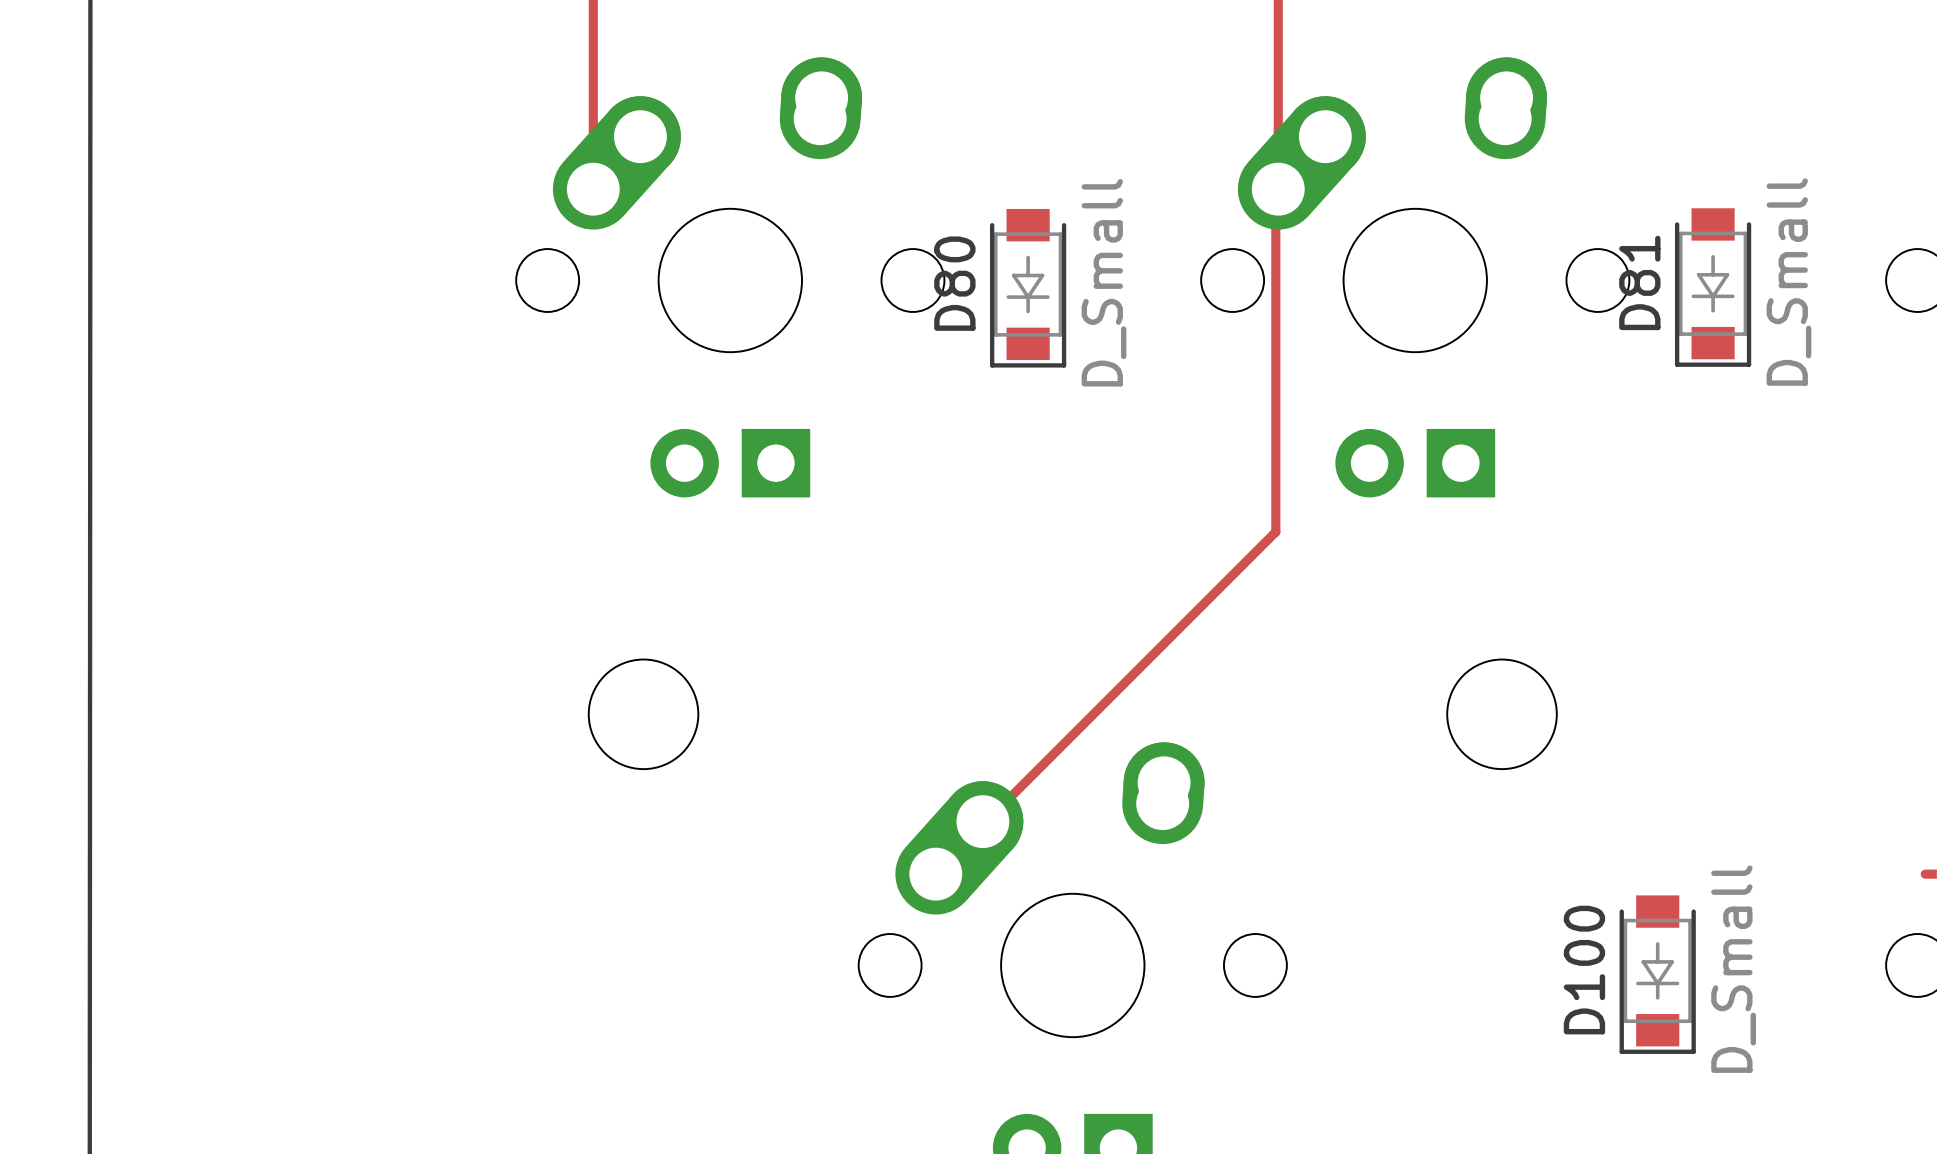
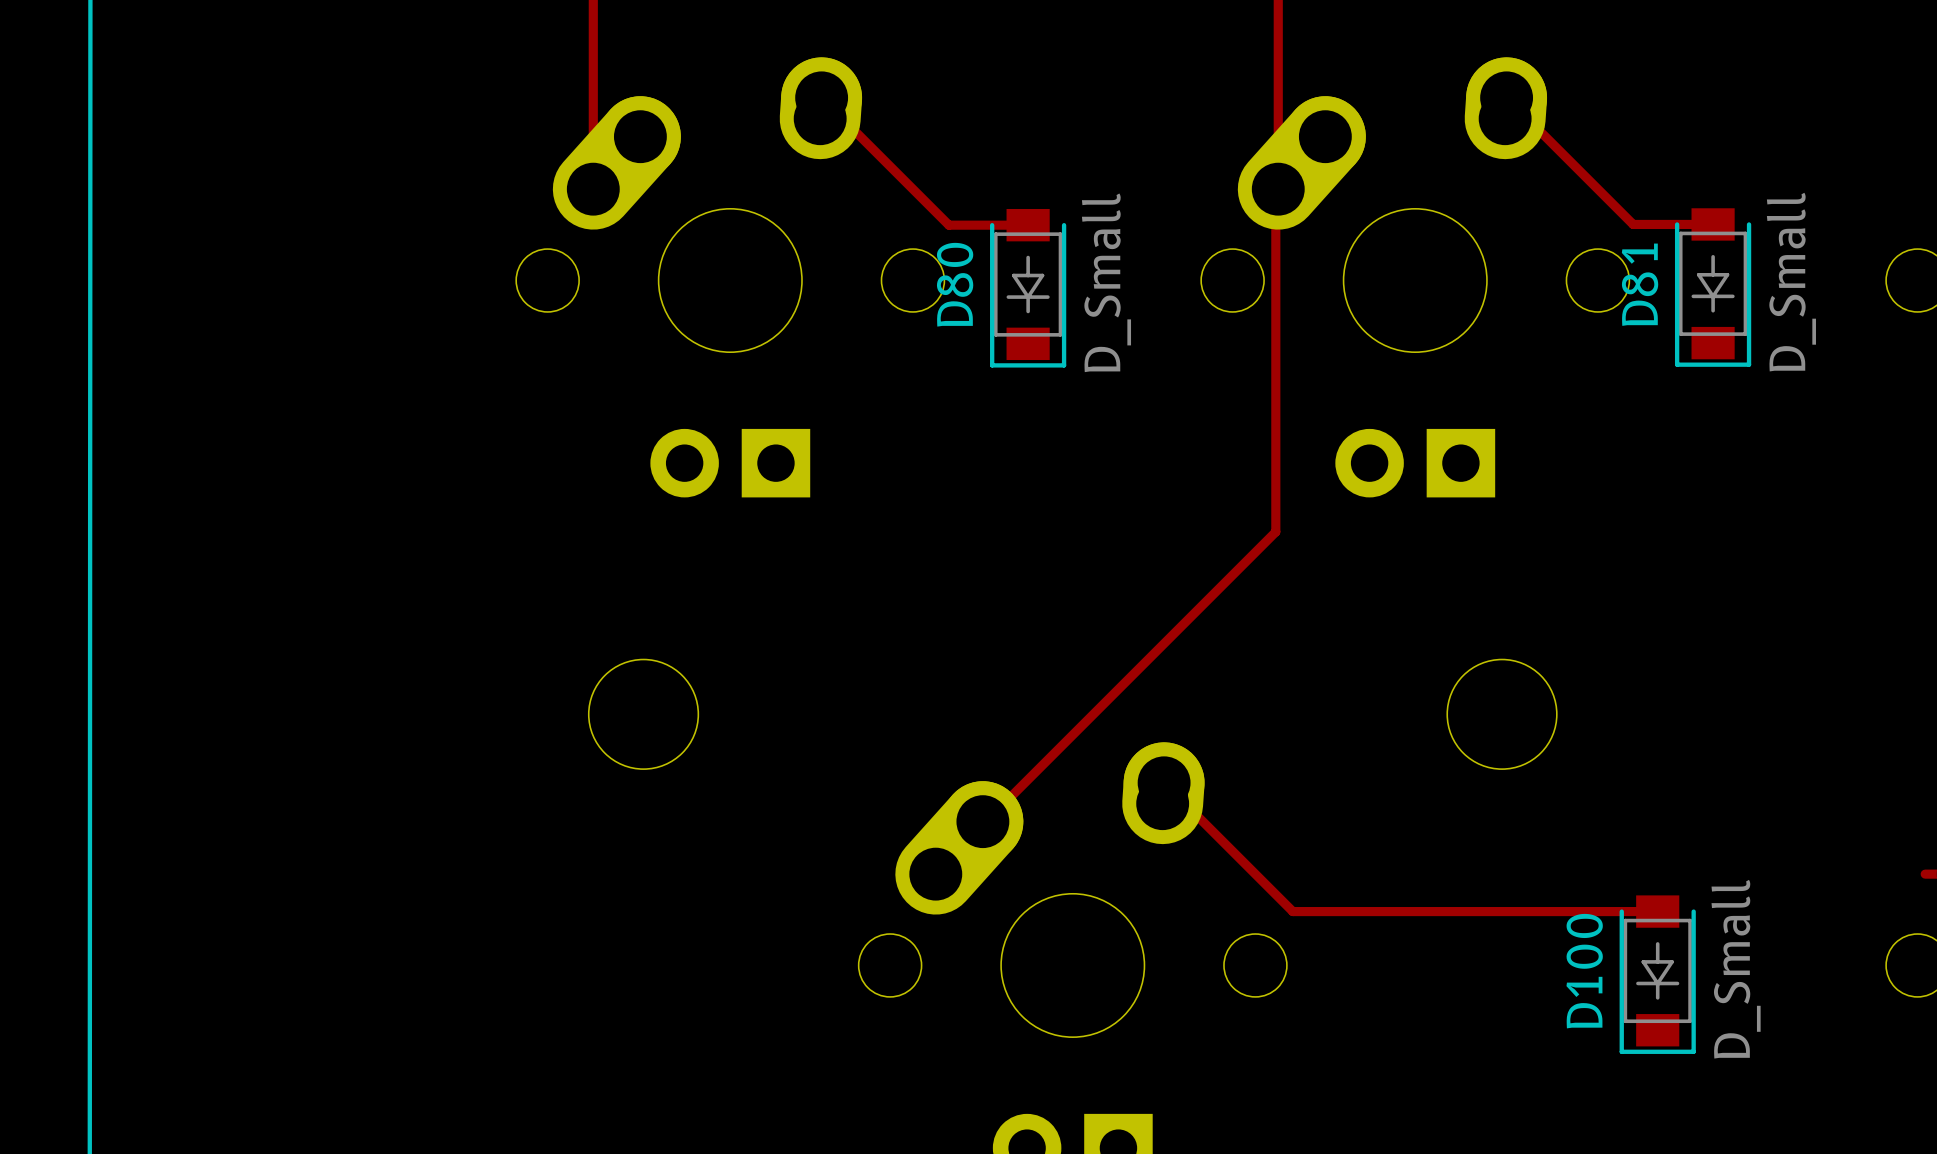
top track: none -> (821, 97) (948, 225) (1028, 225)
top track: none -> (1505, 118) (1527, 118) (1633, 224) (1713, 224)
top track: none -> (1164, 782) (1292, 911) (1657, 911)

